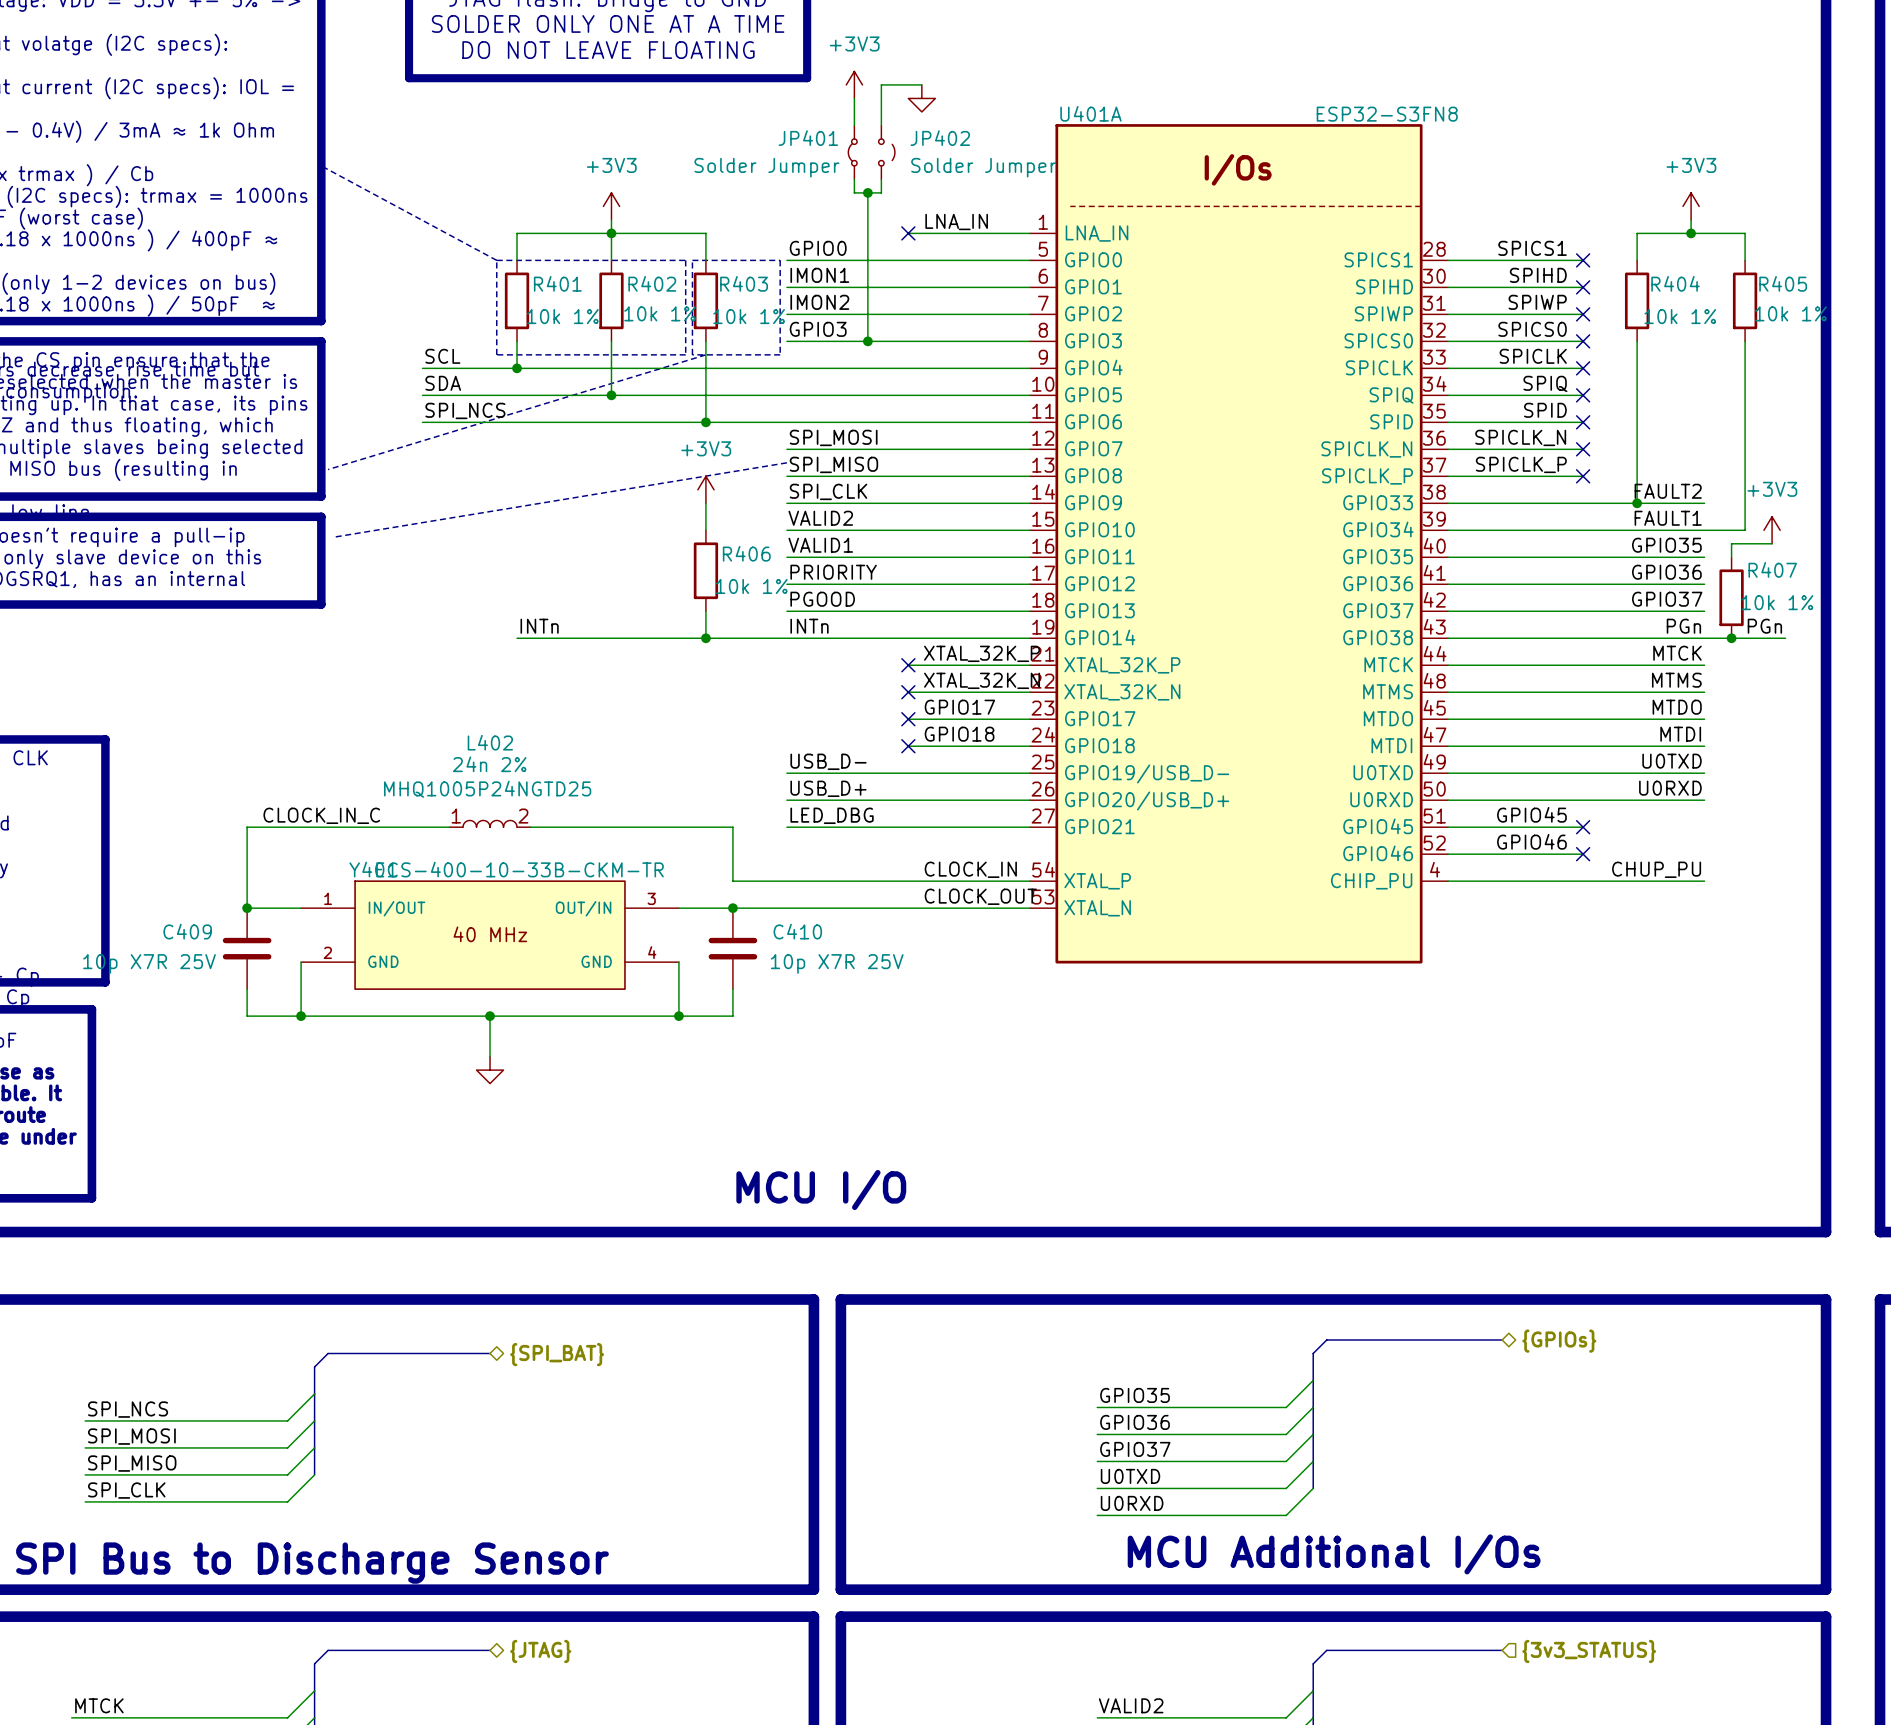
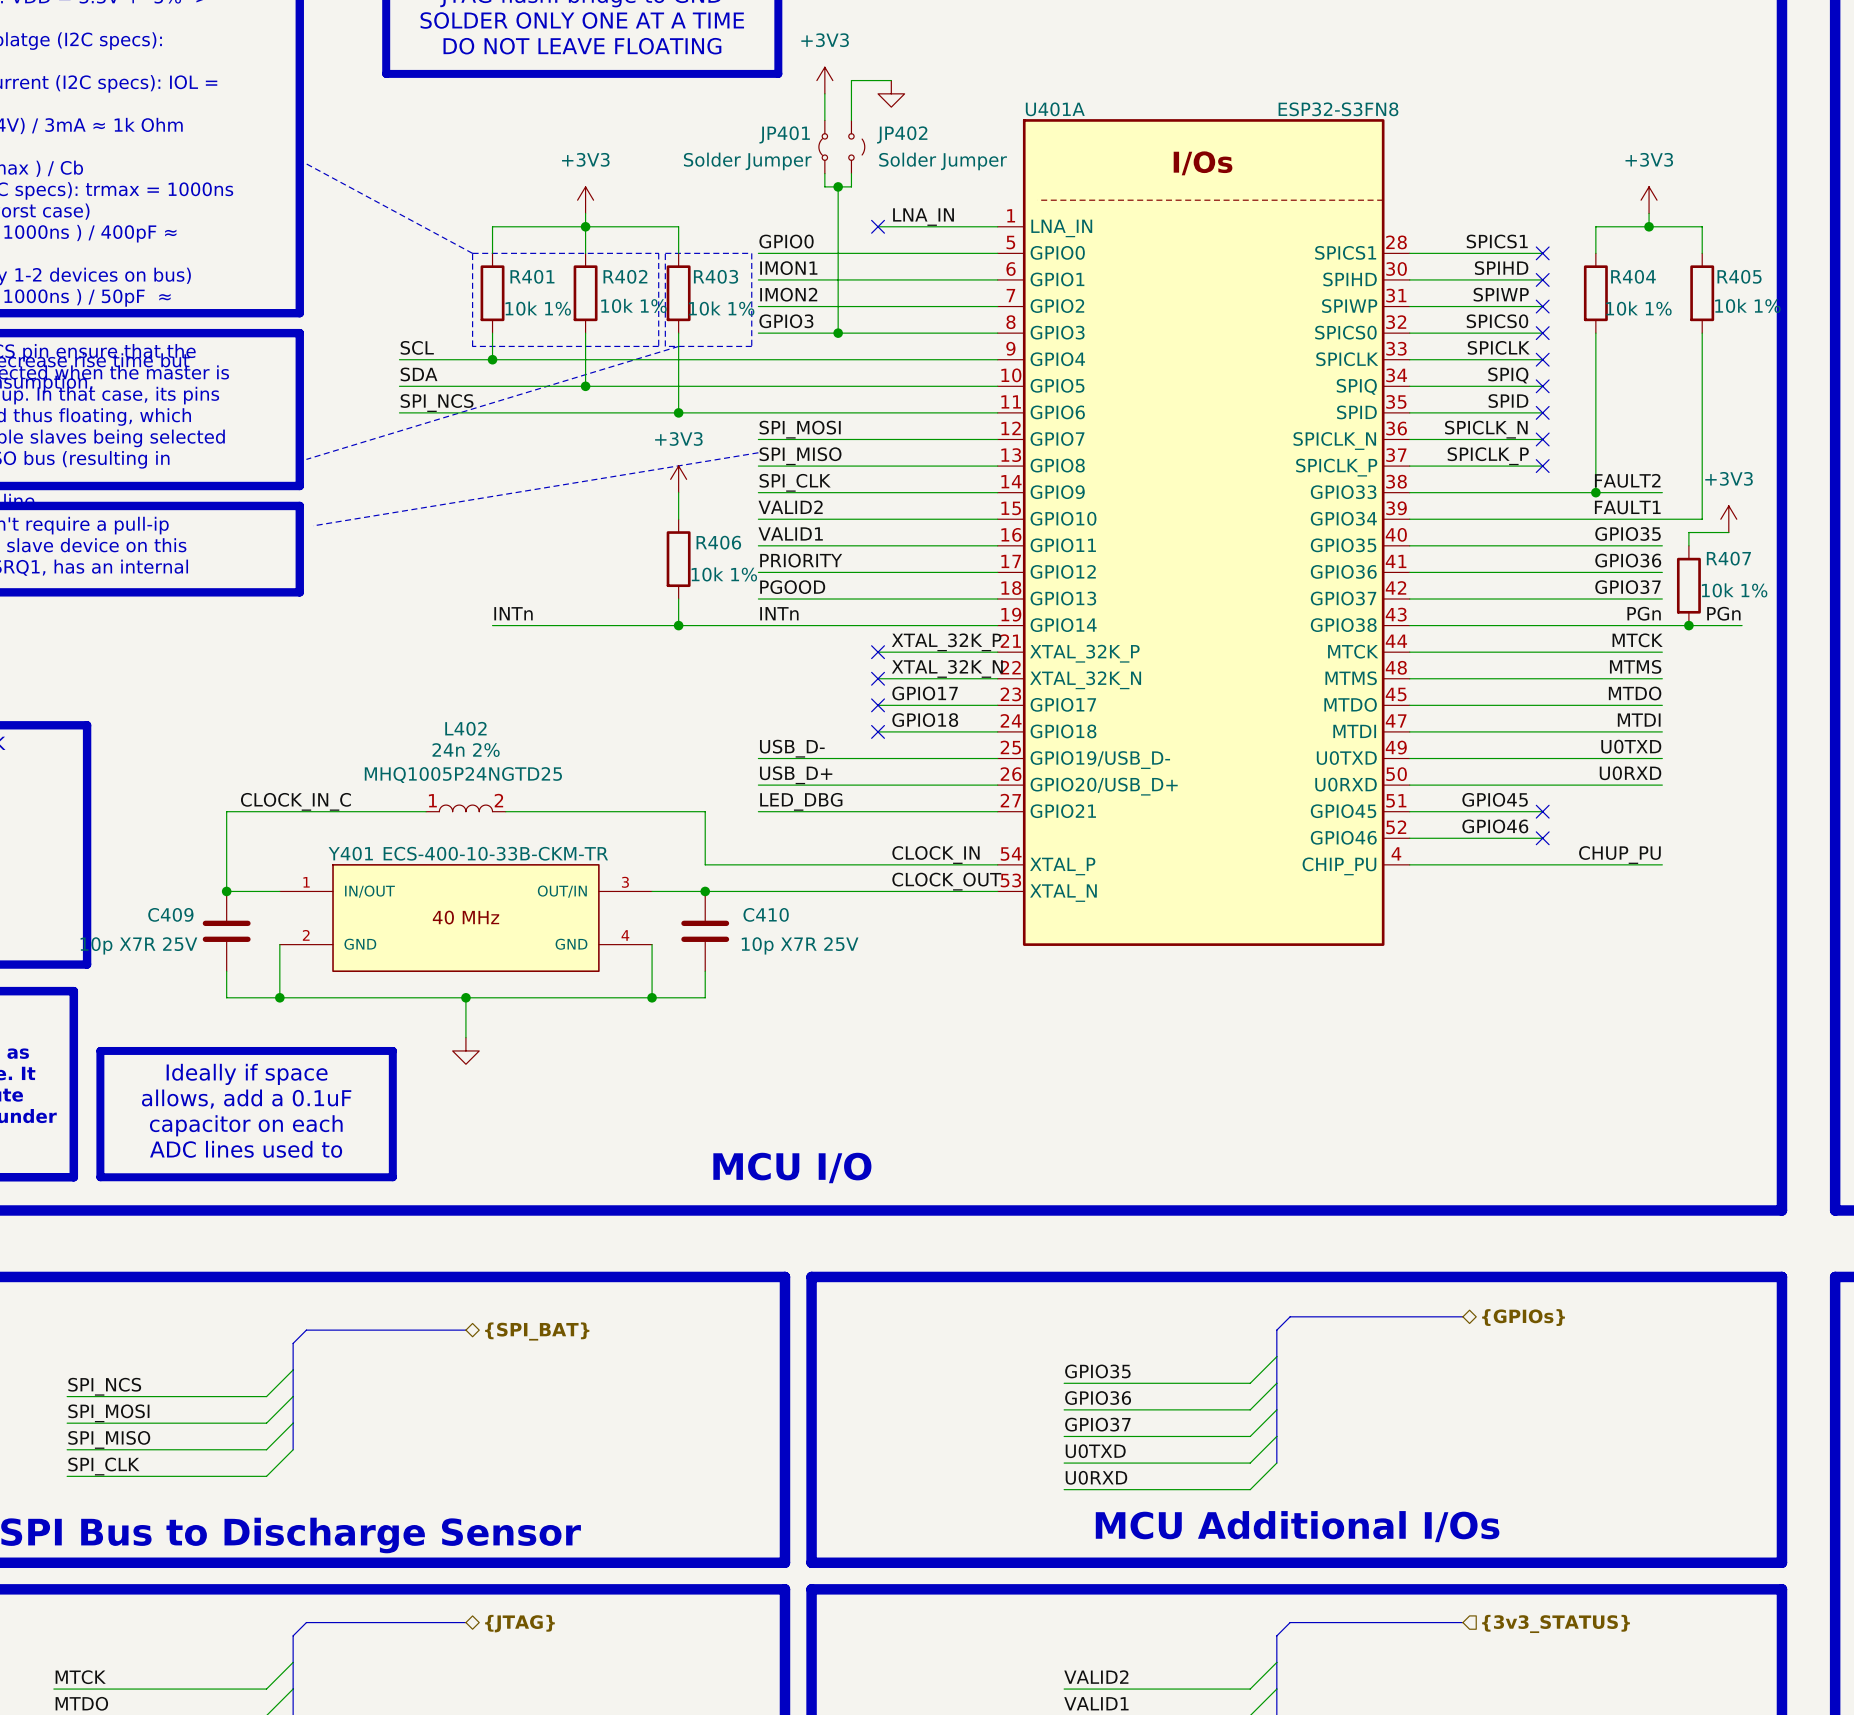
line: none -> (100, 1050) (392, 1050) (392, 1177) (100, 1177) (100, 1050)
text: none -> Ideally if space (247, 1074)
text: none -> allows, add a 0.1uF (246, 1099)
text: none -> capacitor on each (246, 1125)
text: none -> ADC lines used to (246, 1149)

